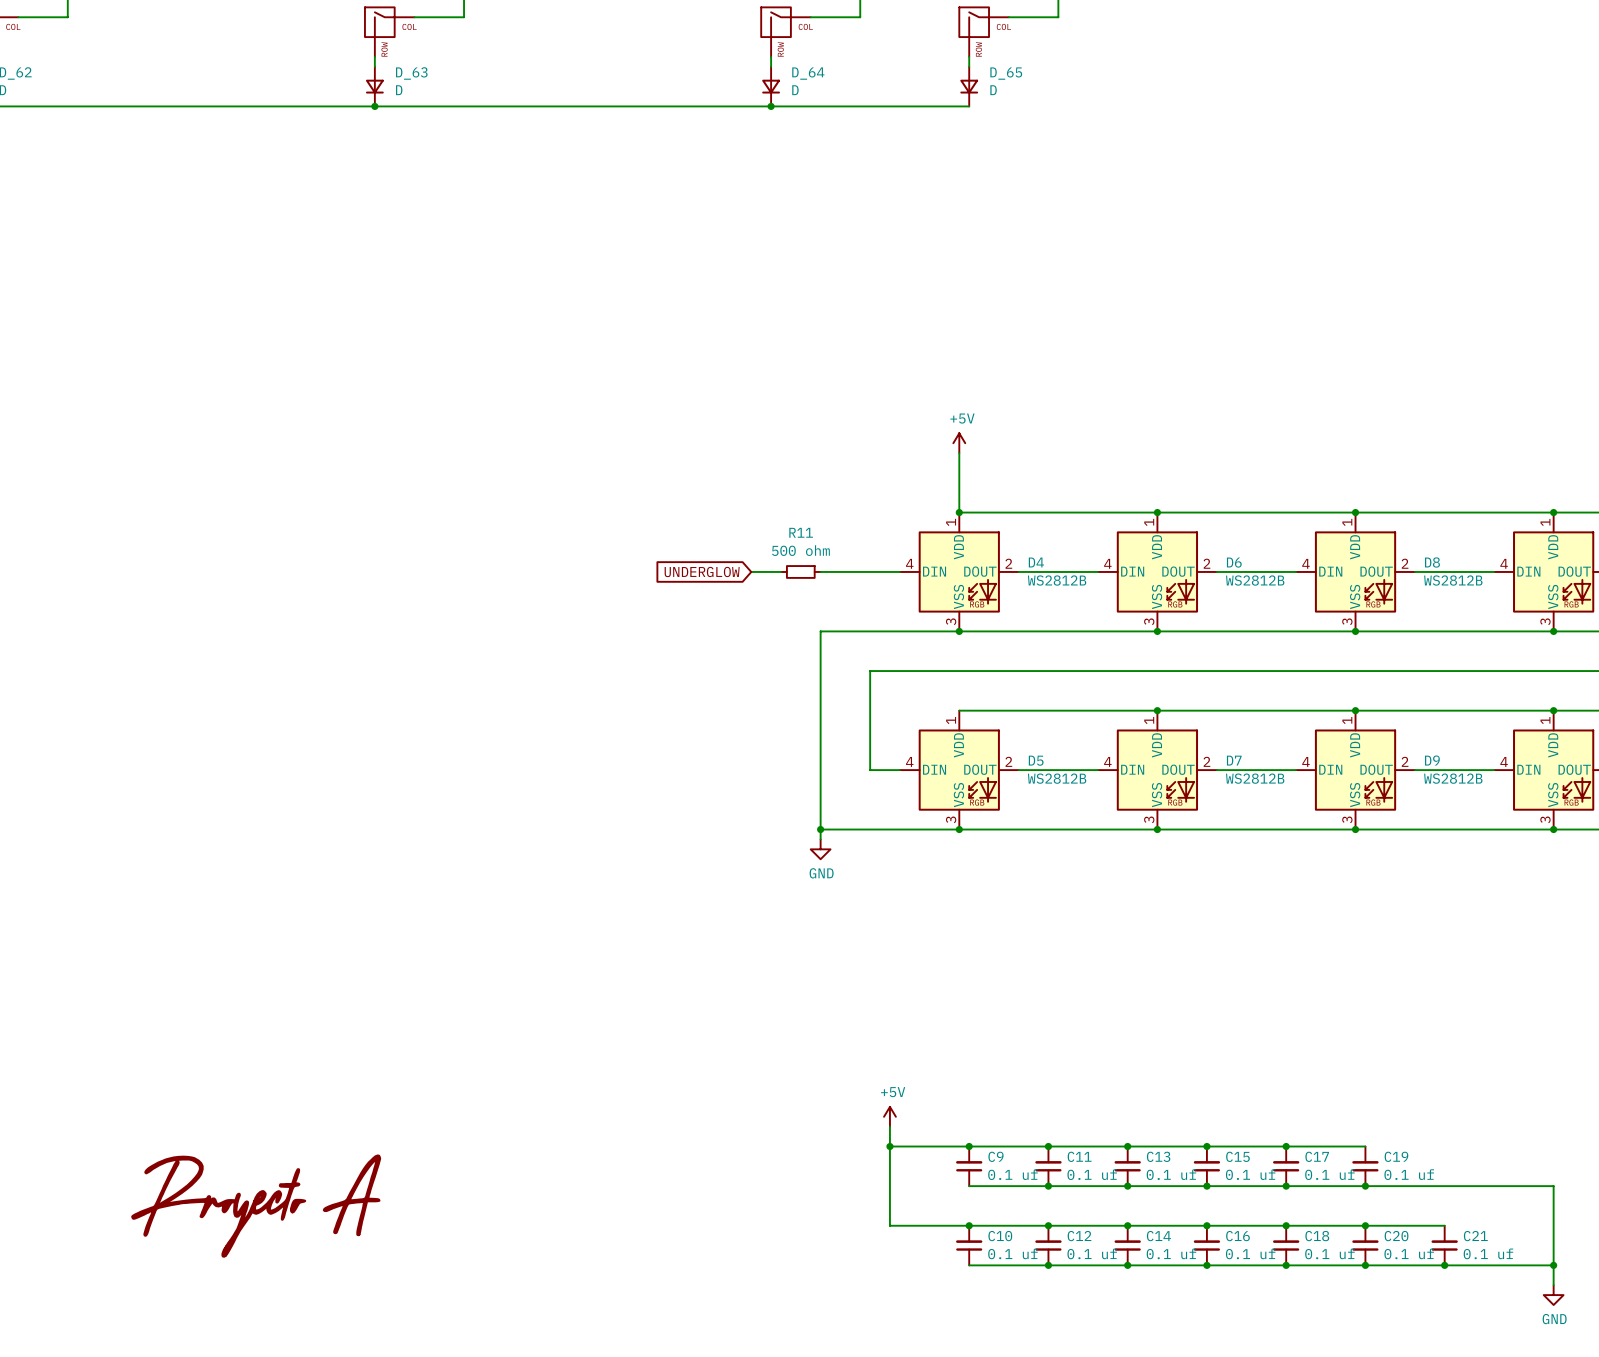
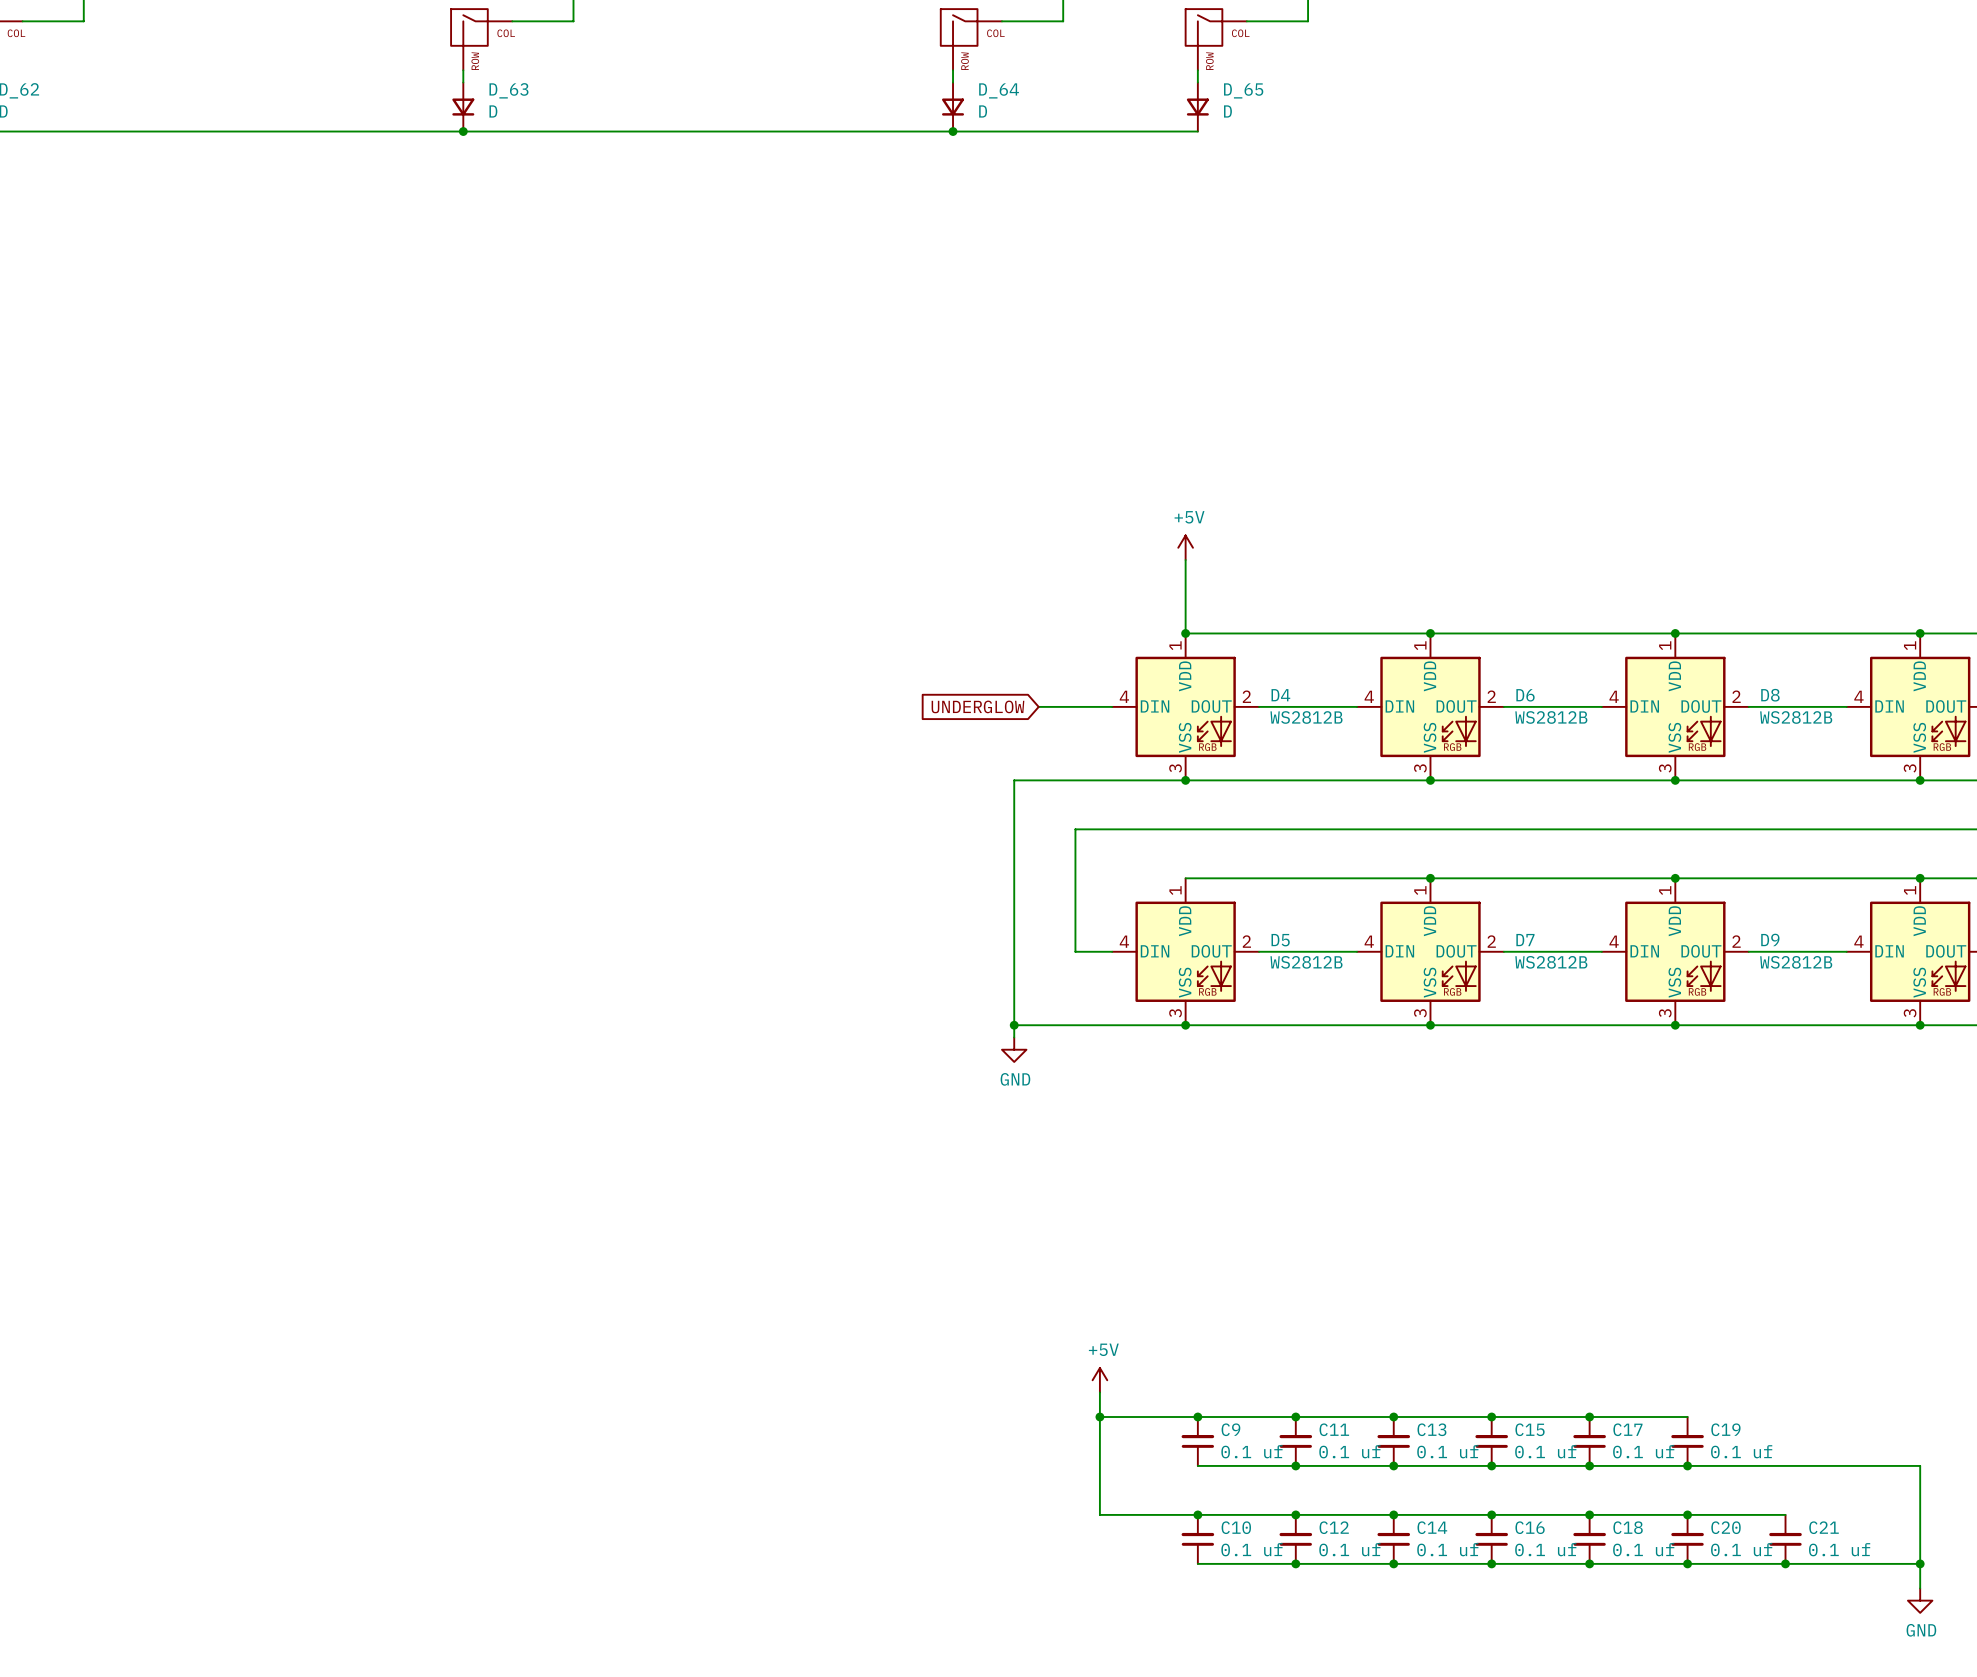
global label position: UNDERGLOW (702, 571) -> UNDERGLOW (977, 706)
wire: (751, 571) (781, 571) -> none
R11: 500 ohm (800, 571) -> none
wire: (820, 571) (840, 571) -> none
power symbol: (256, 1206) -> none

